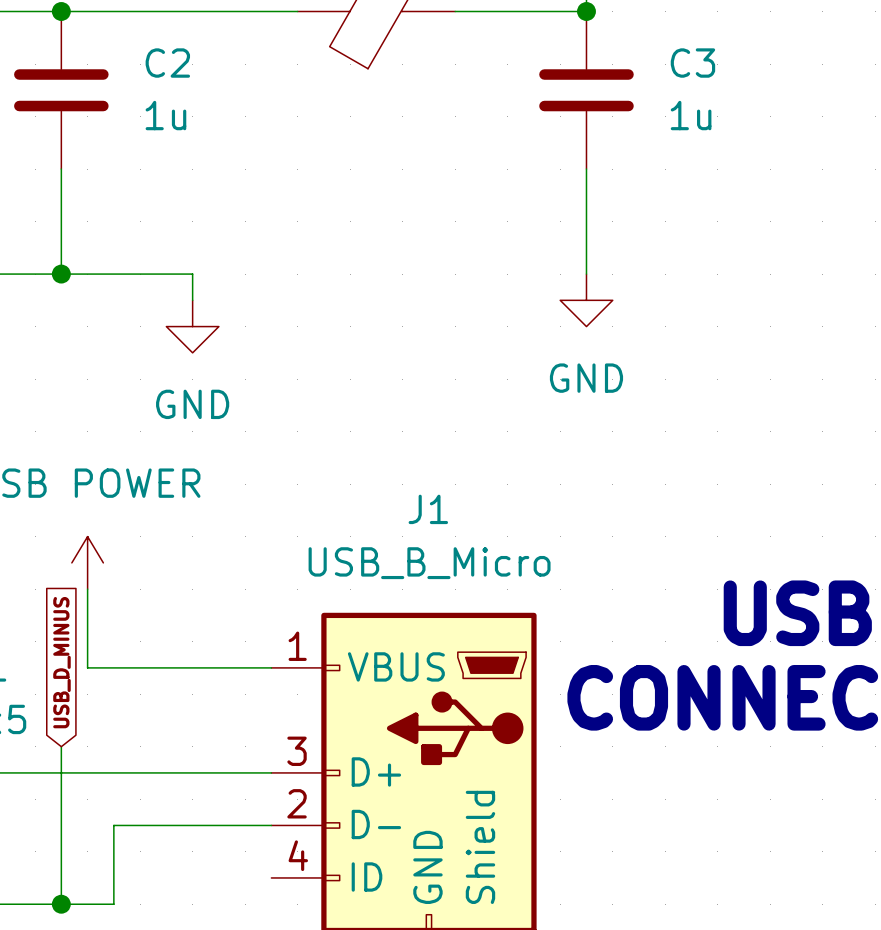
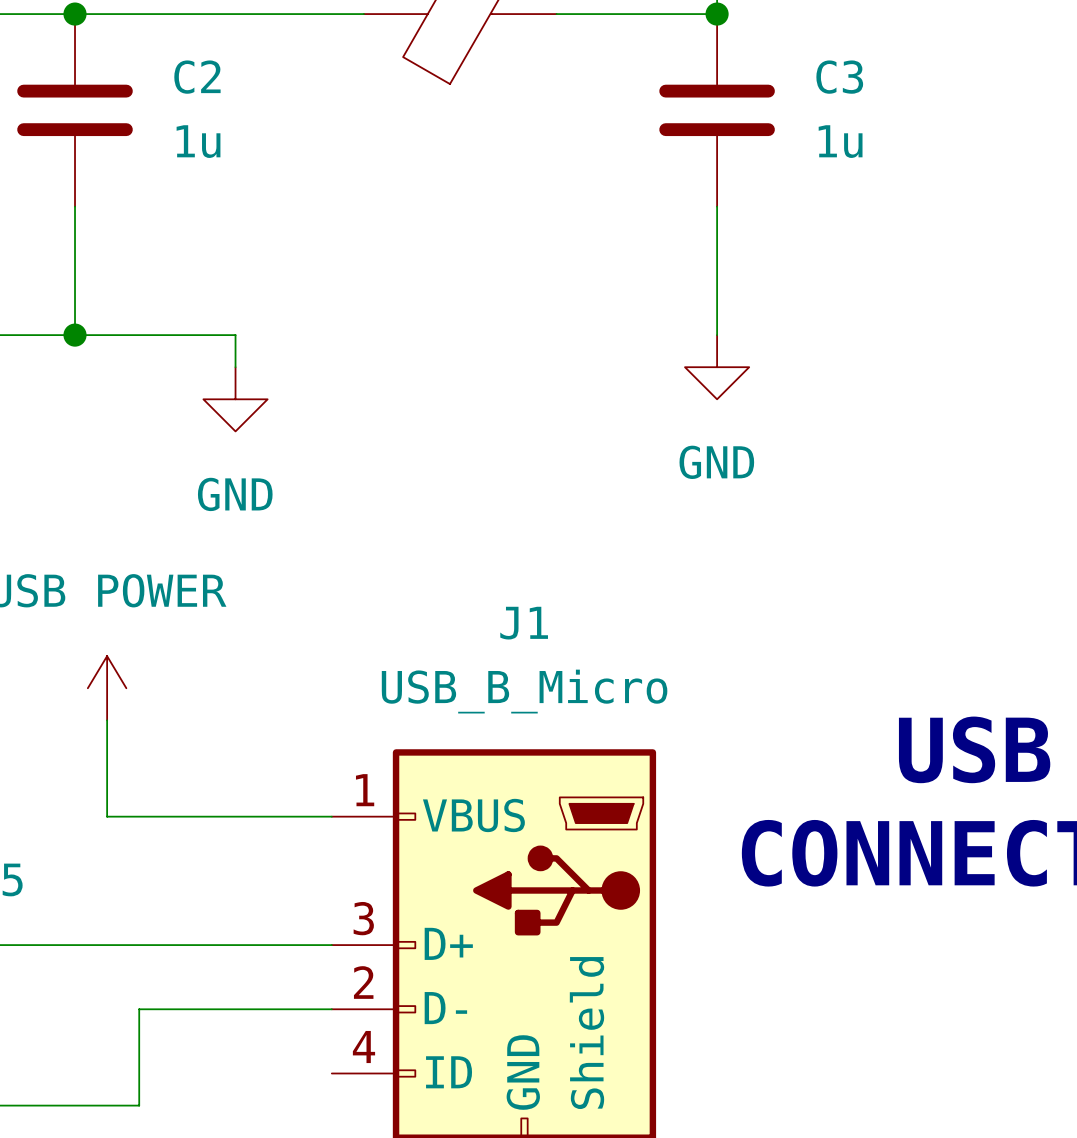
global label: USB_D_MINUS (61, 662) -> none
wire: (61, 746) (61, 904) -> none
junction: (61, 904) -> none

